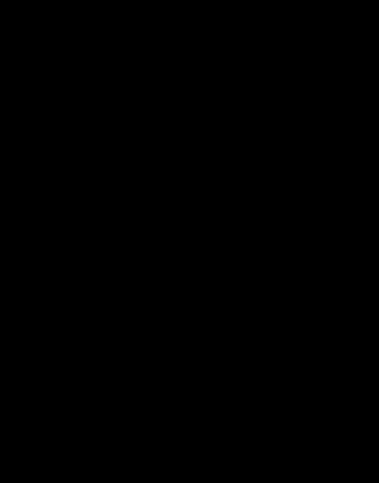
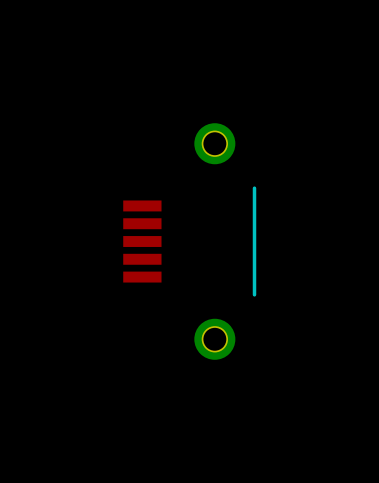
part: none -> (189, 241)

